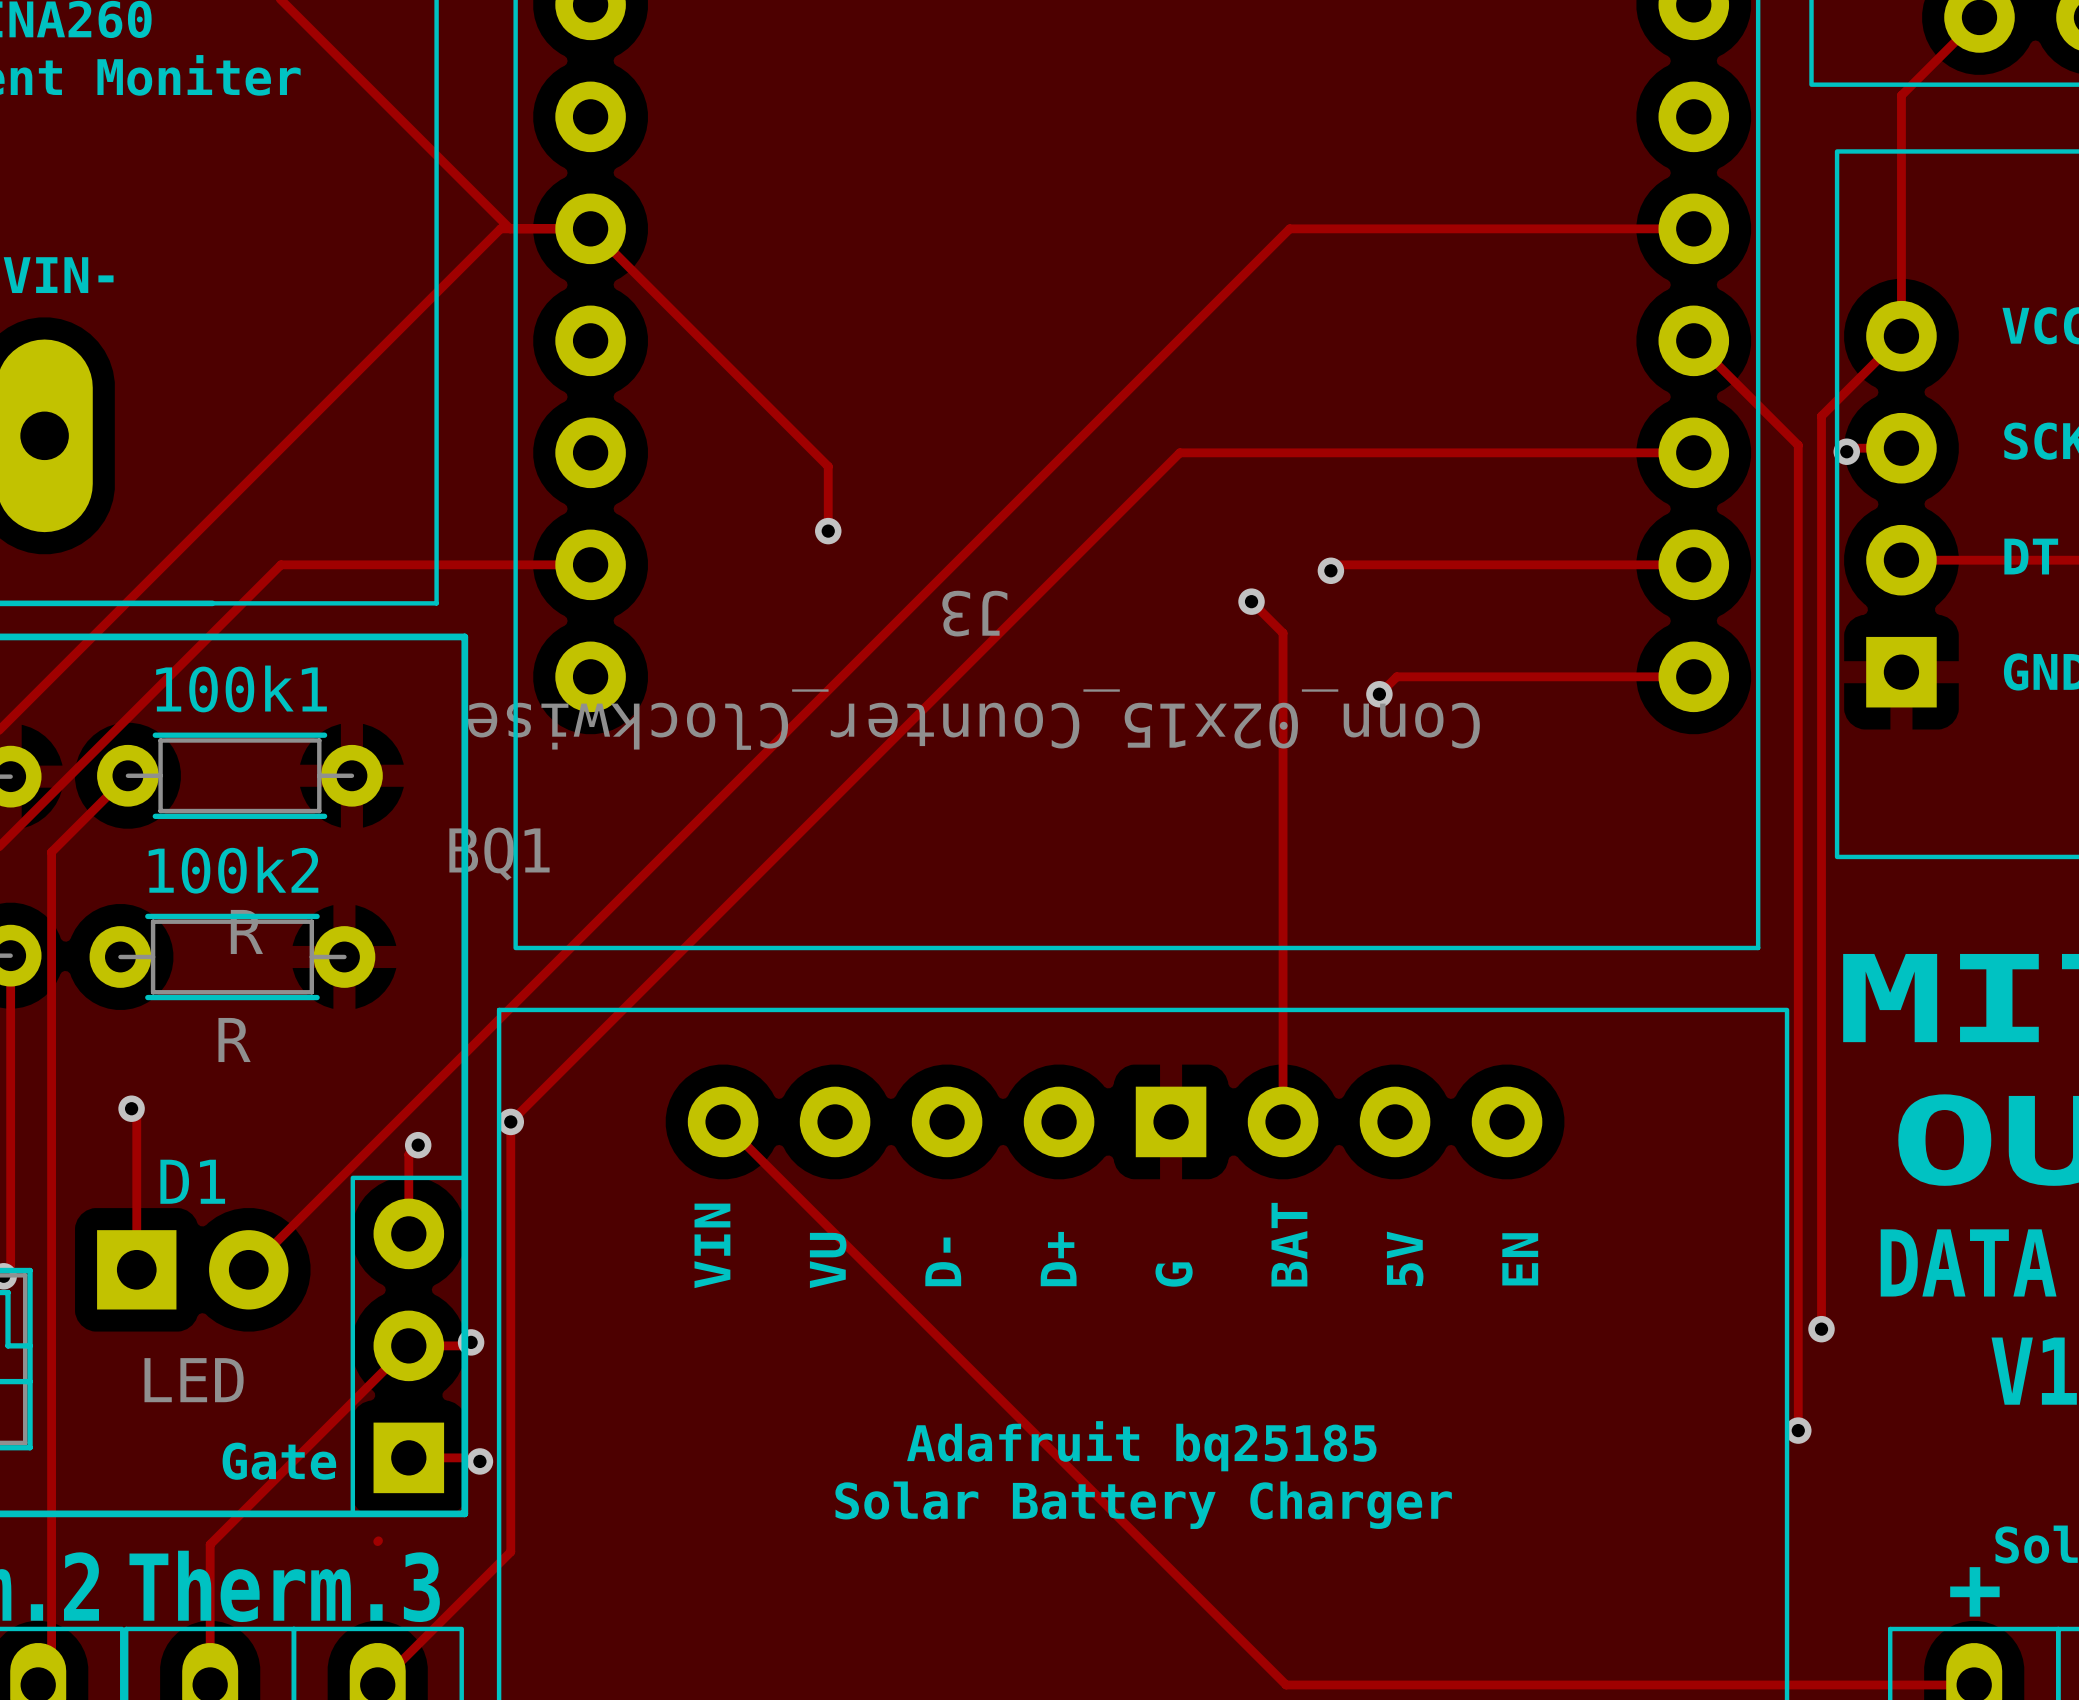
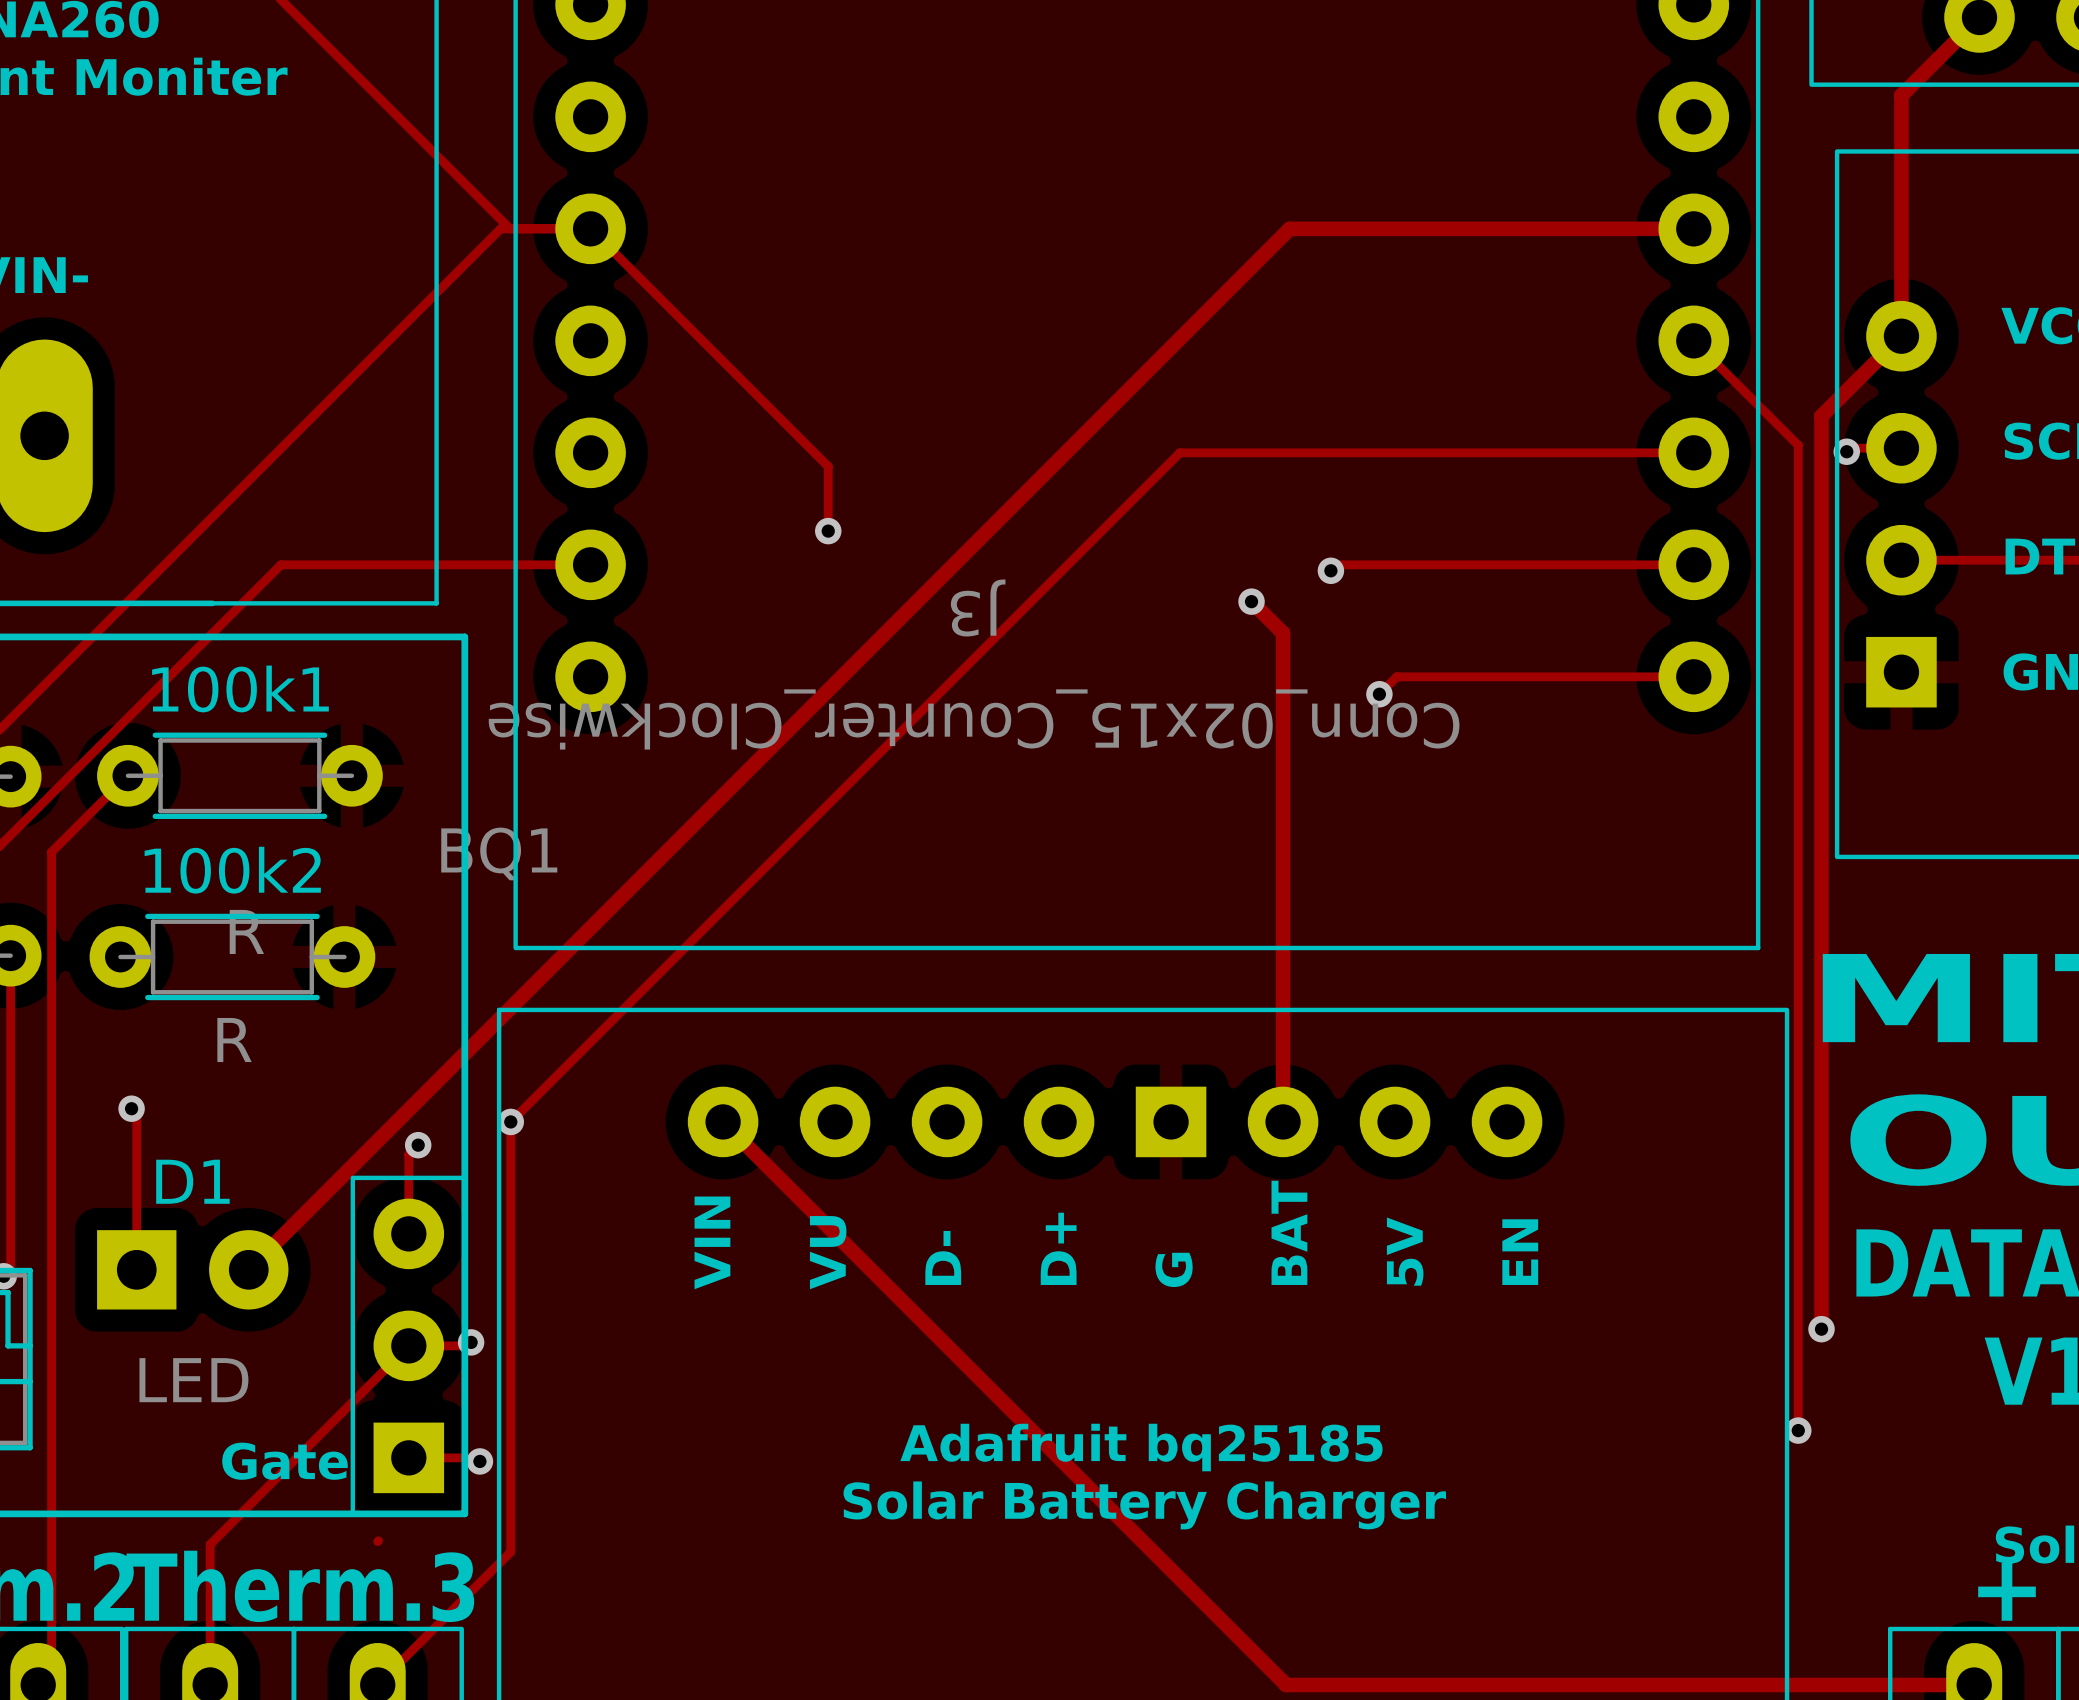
track width: thin (1979, 17) (1901, 95) (1901, 336) (1821, 416) (1821, 1329) -> thick (1979, 17) (1901, 95) (1901, 336) (1821, 416) (1821, 1329)
track width: thin (1693, 228) (1289, 228) (248, 1269) -> thick (1693, 228) (1289, 228) (248, 1269)
track width: thin (1251, 601) (1283, 633) (1283, 1121) -> thick (1251, 601) (1283, 633) (1283, 1121)
track width: thin (723, 1121) (1286, 1685) (1974, 1685) -> thick (723, 1121) (1286, 1685) (1974, 1685)

